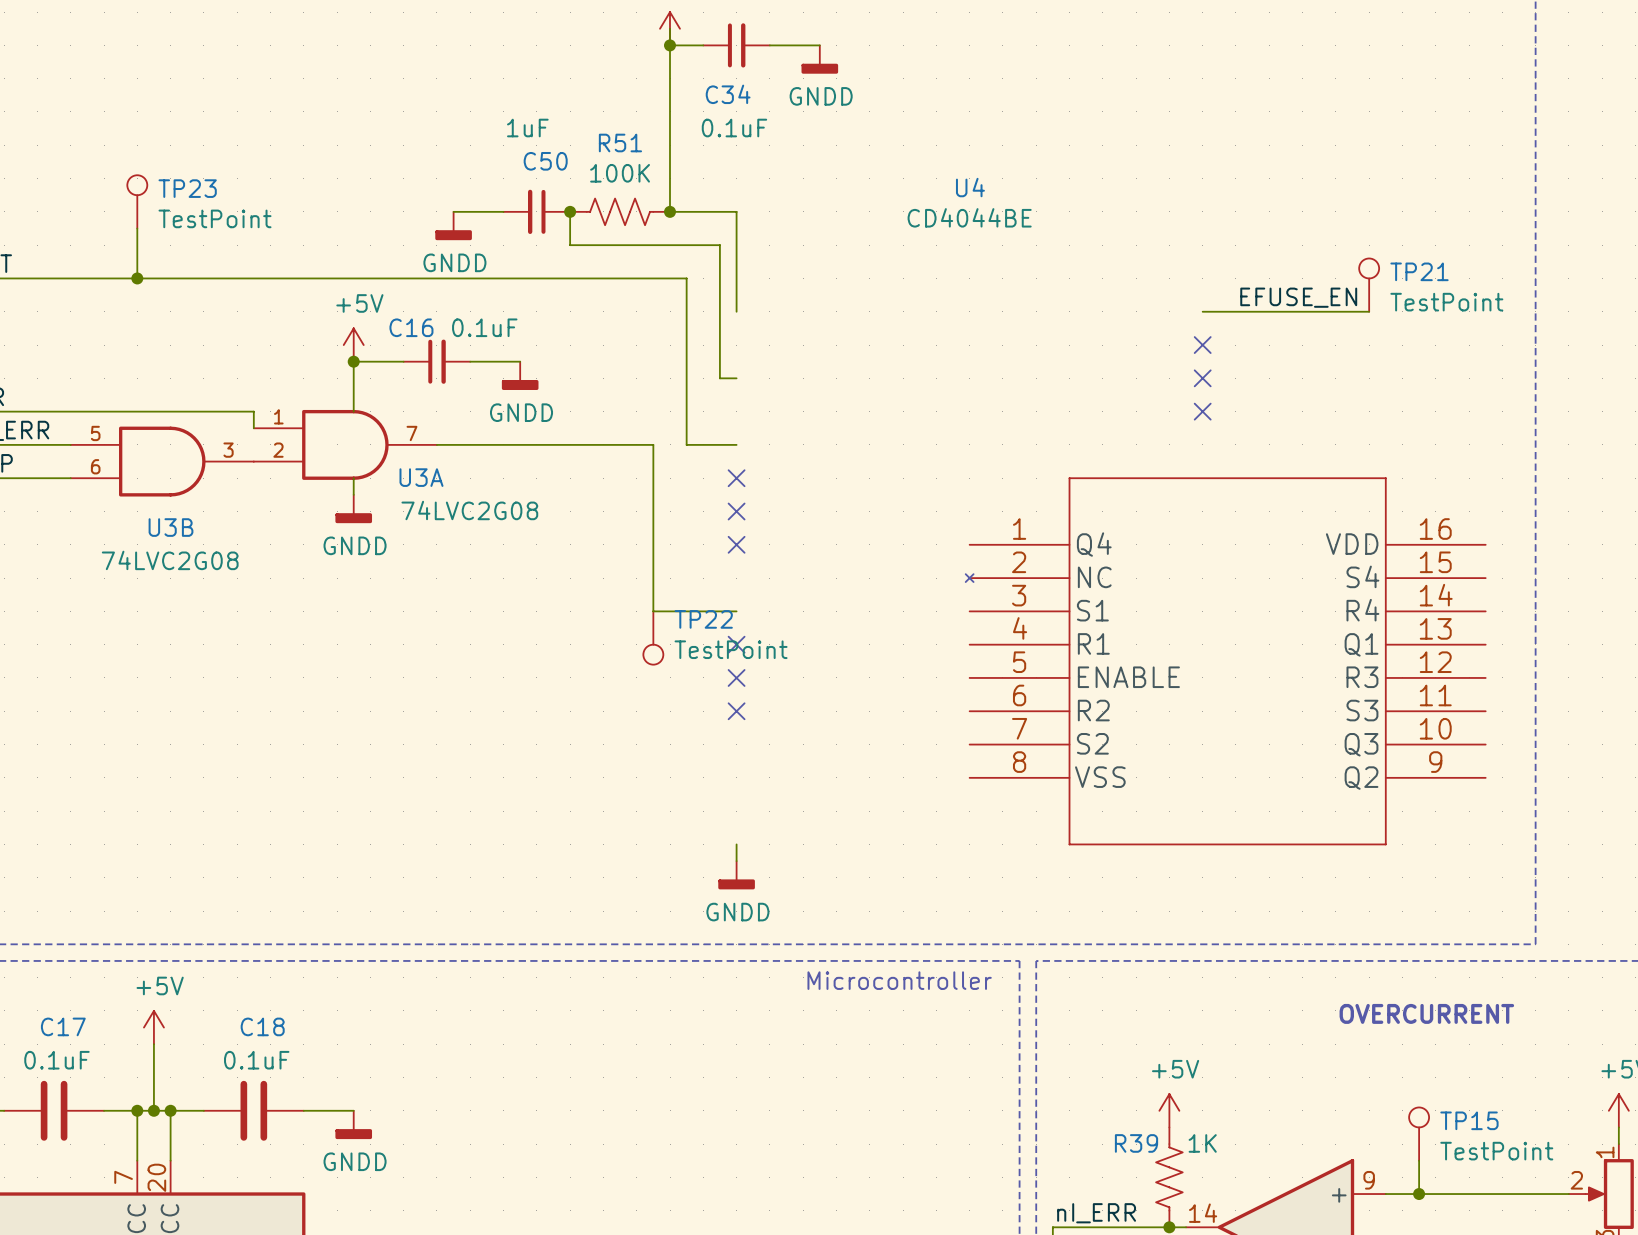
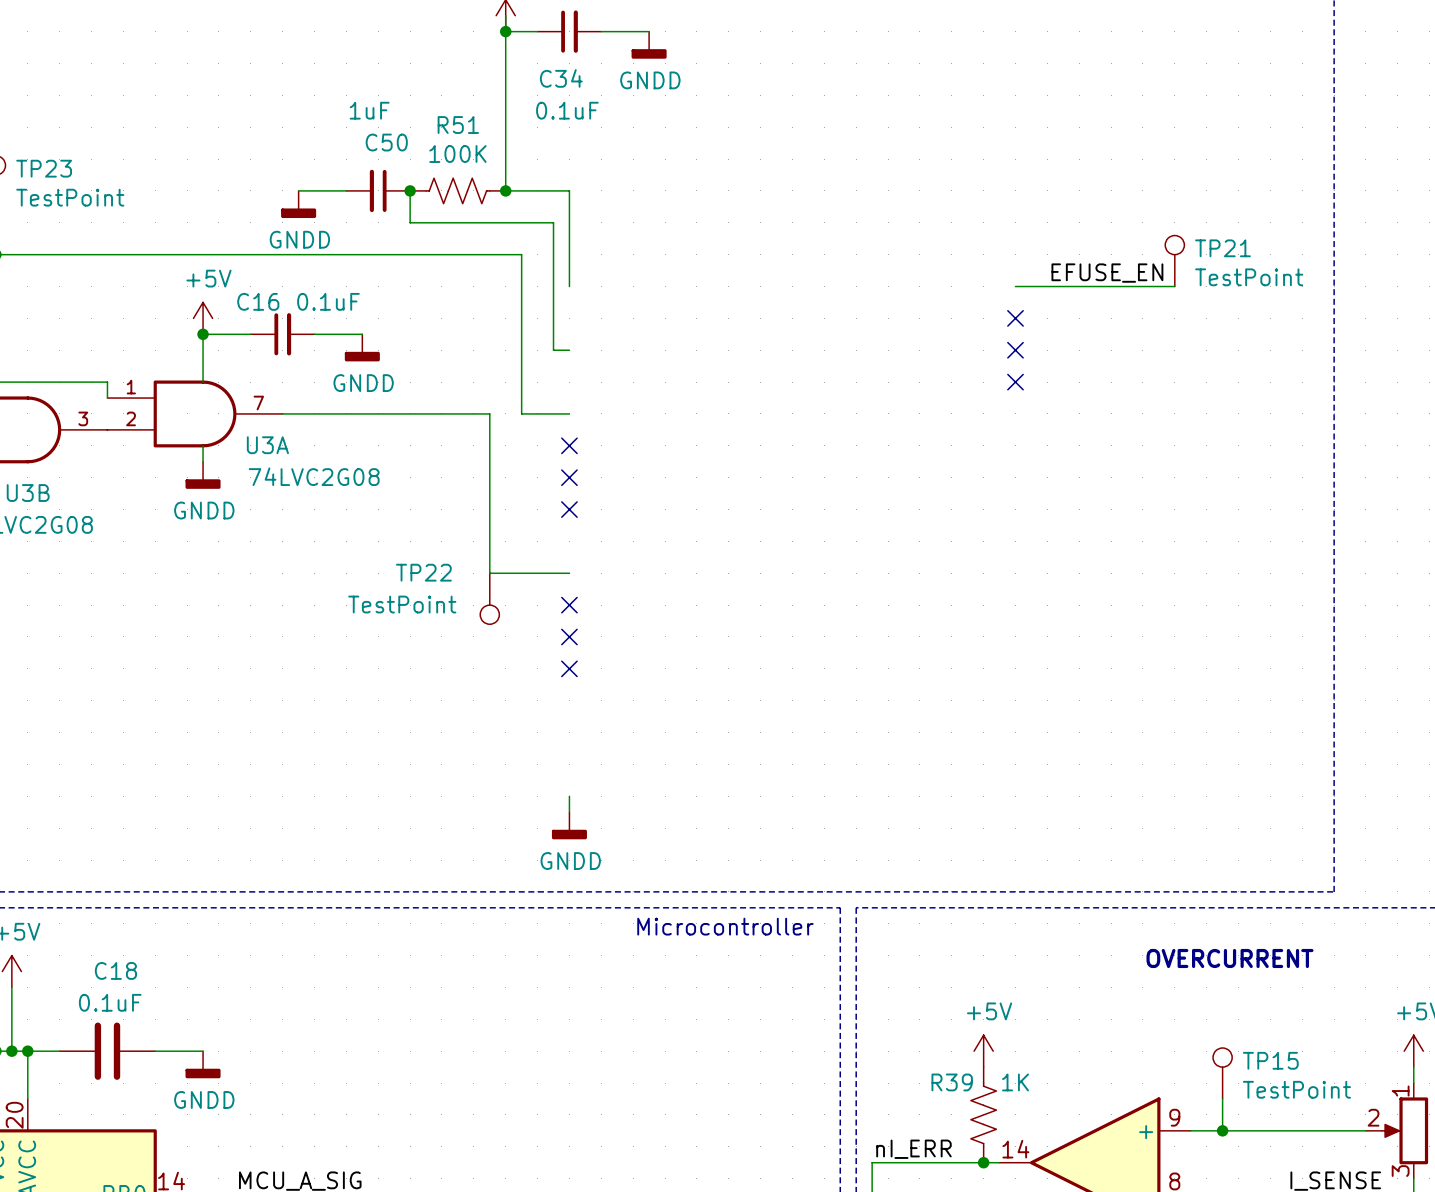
TP22 name position: TP22 (703, 619) -> TP22 (423, 572)
TP22 value position: TestPoint (731, 649) -> TestPoint (402, 604)
U4: CD4044BE (1225, 661) -> none

